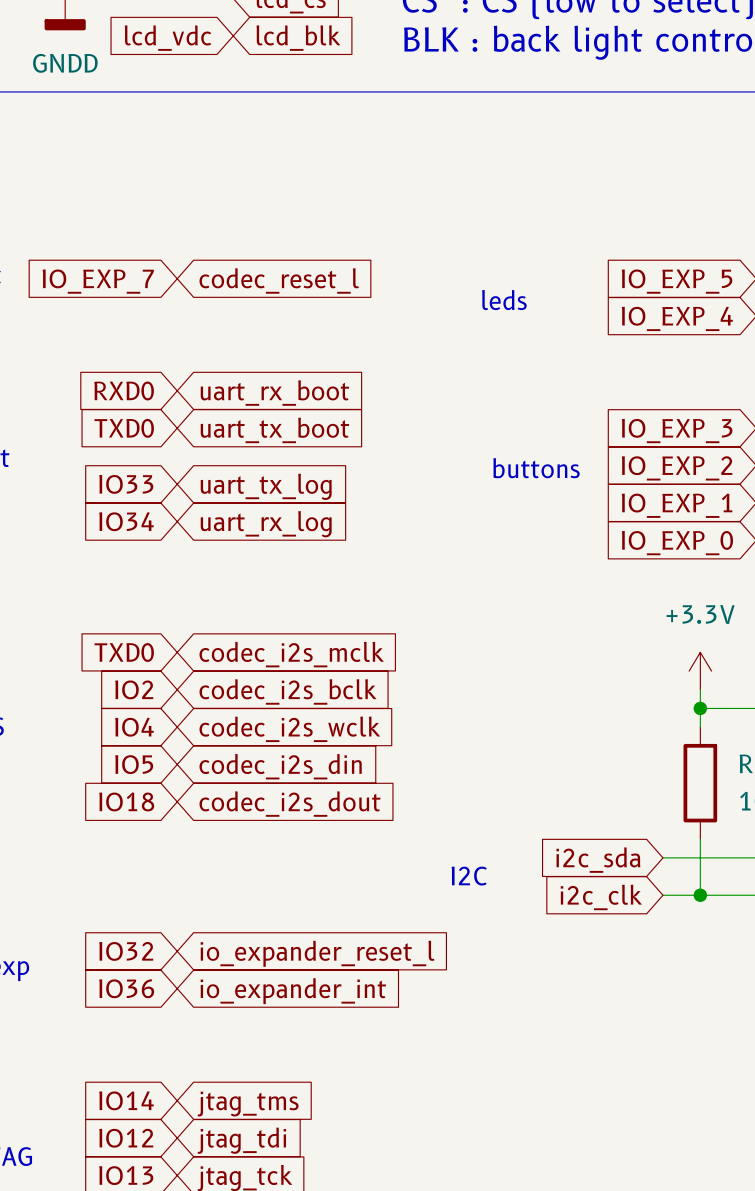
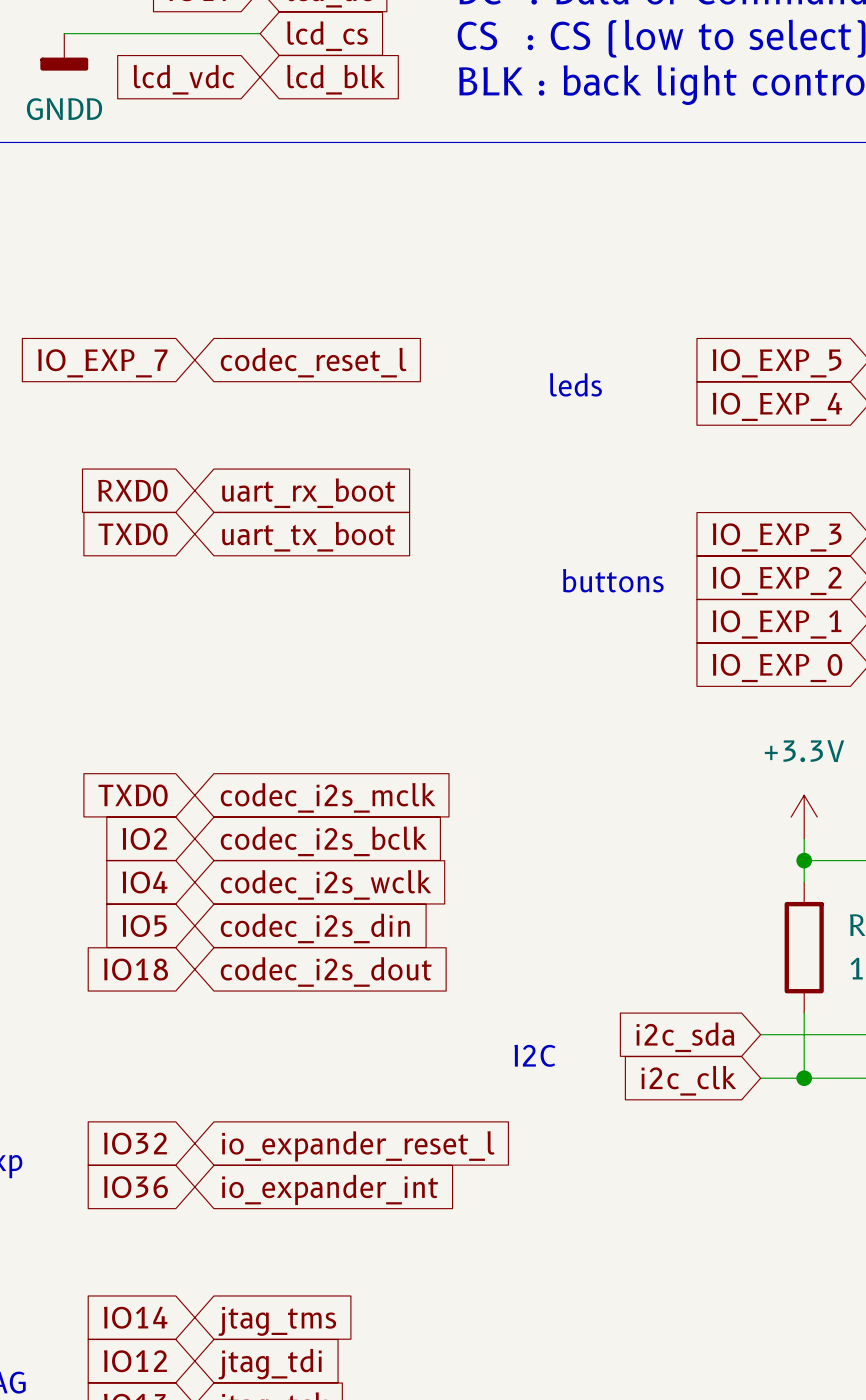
global label: IO33 (126, 484) -> none
global label: uart_tx_log (266, 486) -> none
global label: IO34 (126, 521) -> none
global label: uart_rx_log (266, 524) -> none

